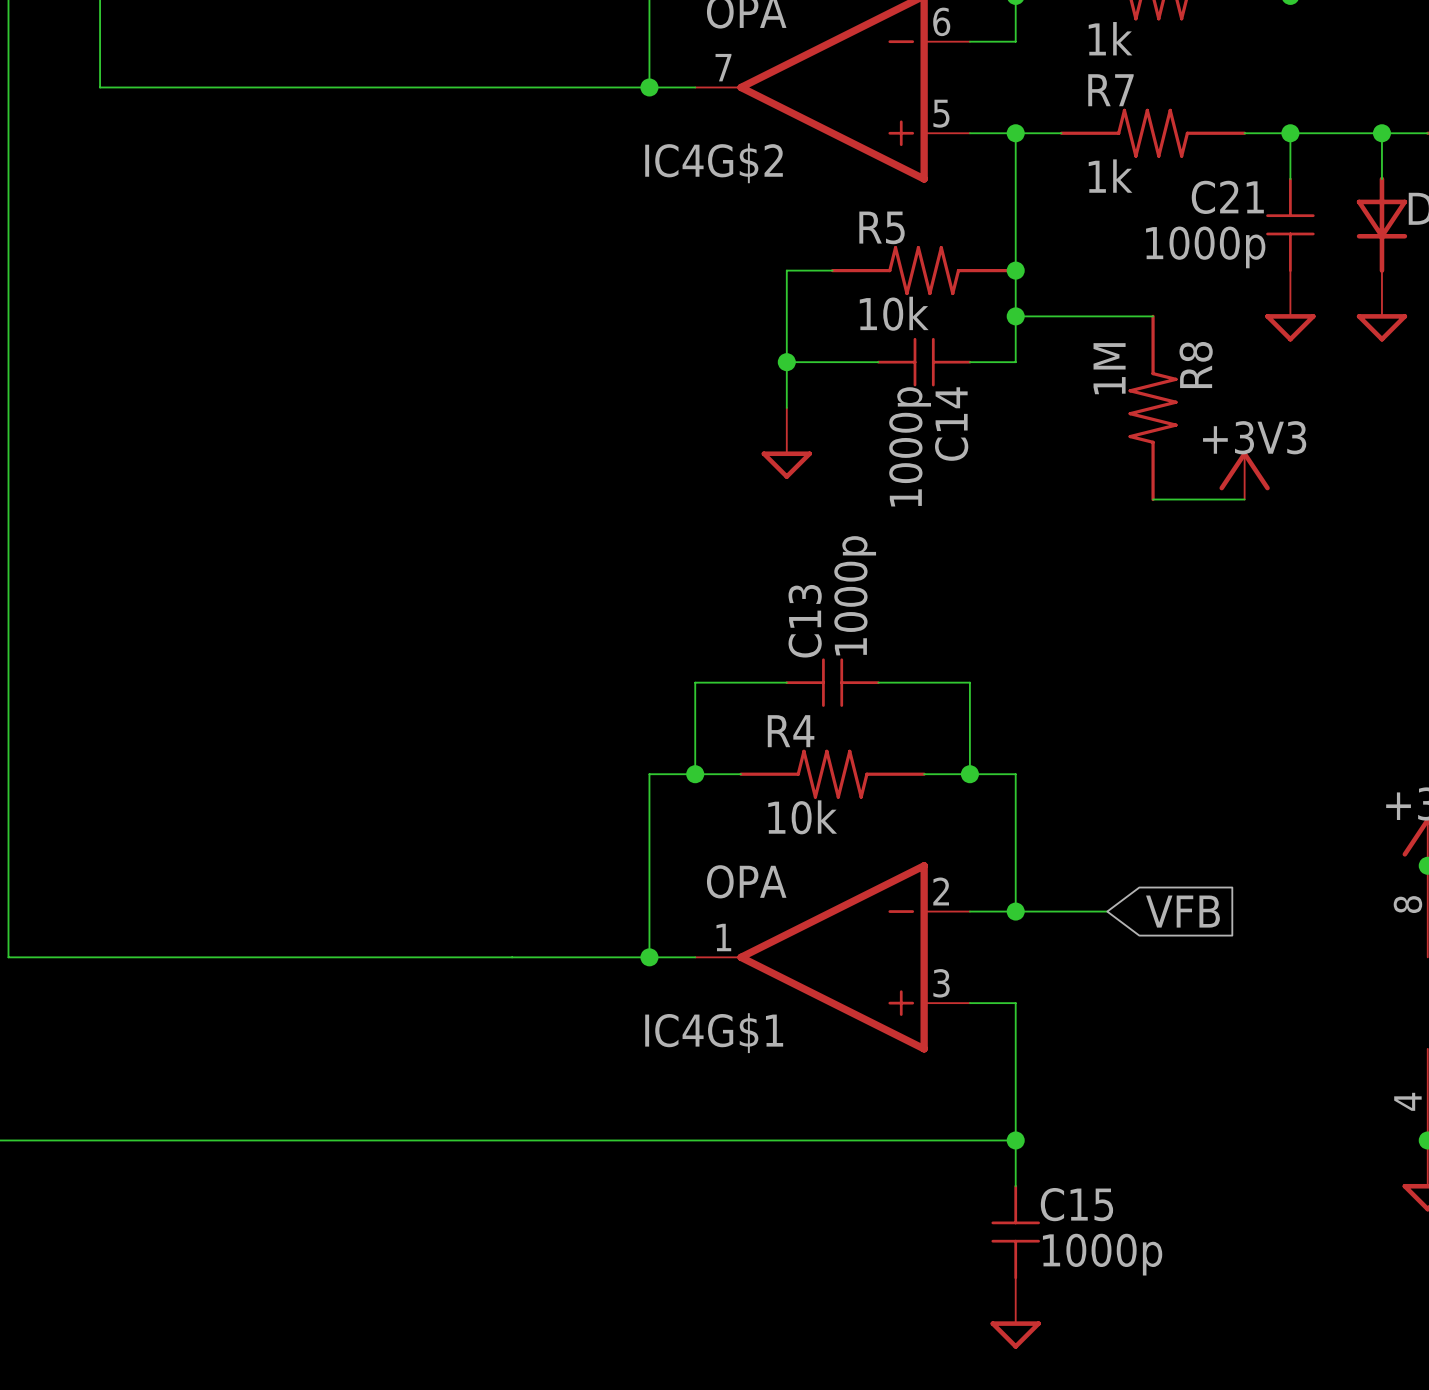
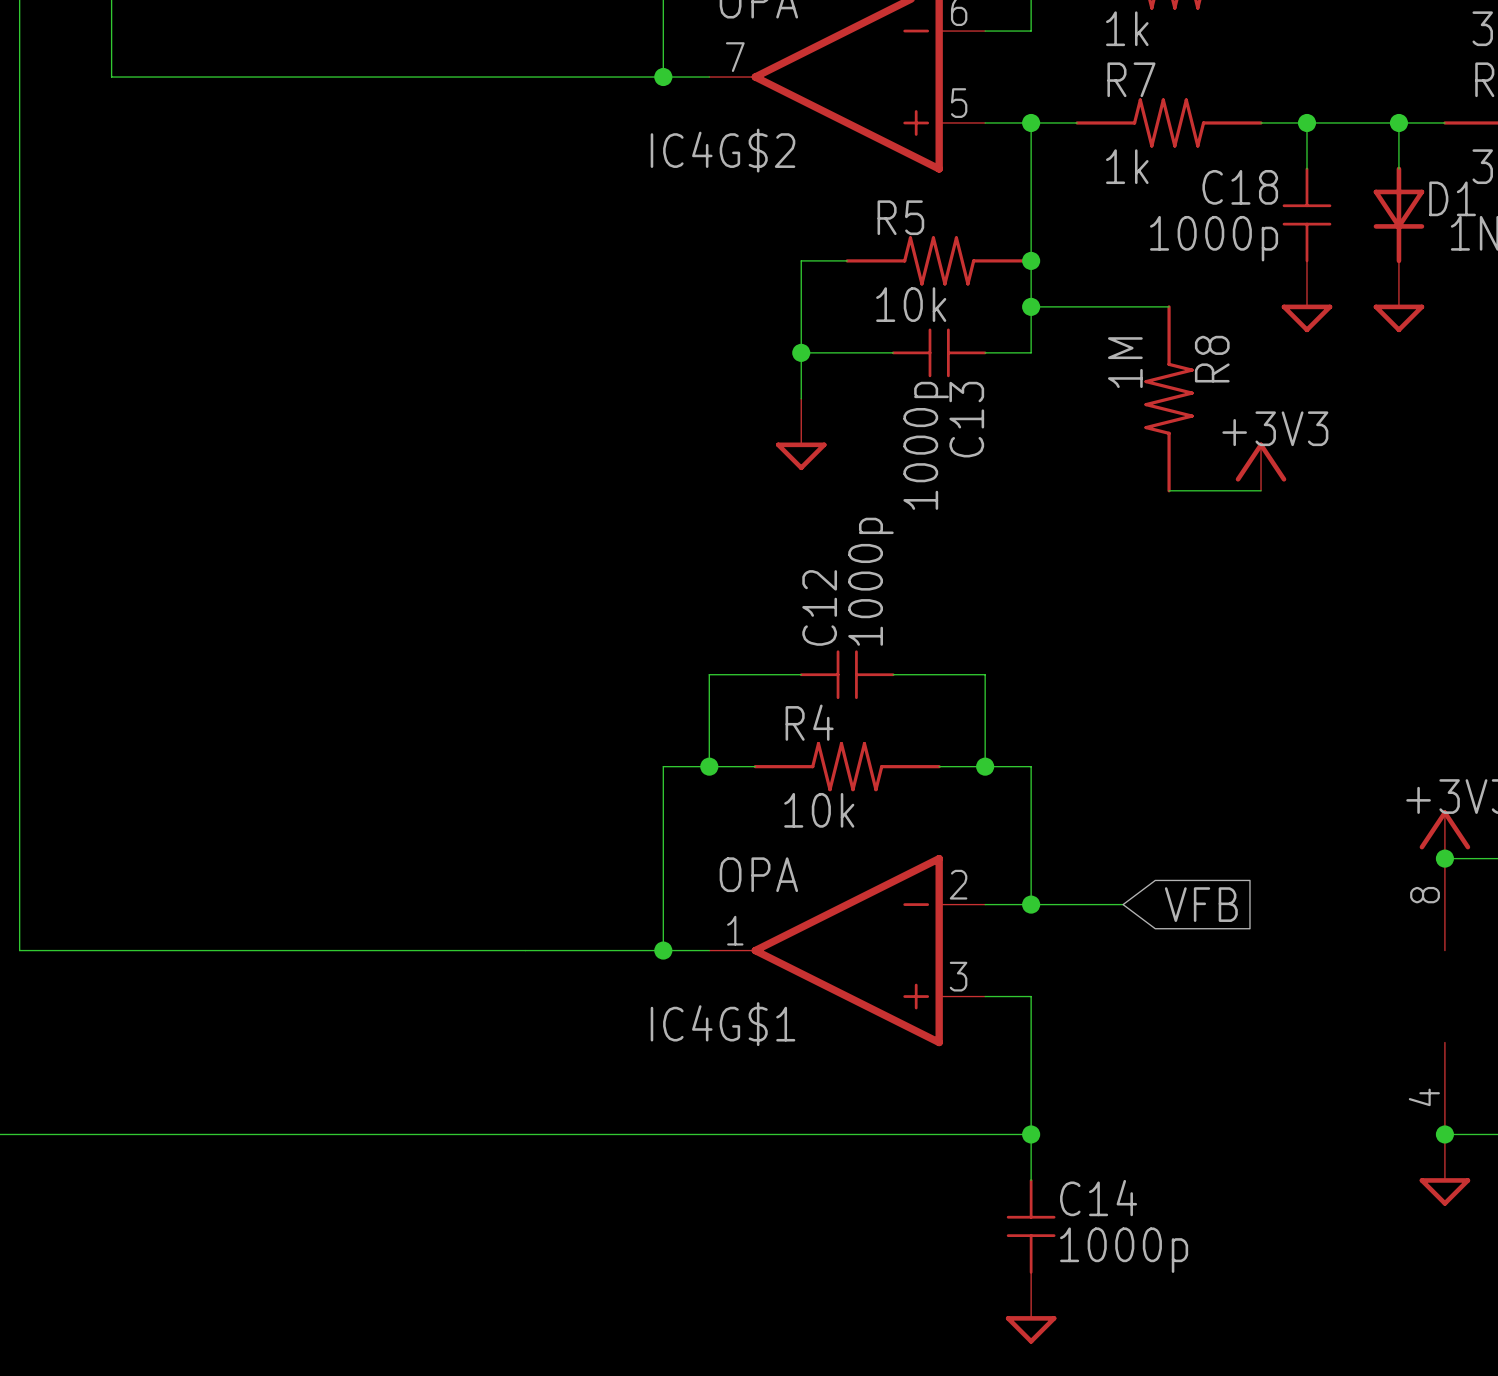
C21 name: C21 (1227, 197) -> C18 (1240, 187)
C14 name: C14 (951, 424) -> C13 (966, 419)
C13 name: C13 (805, 621) -> C12 (819, 607)
C15 name: C15 (1076, 1204) -> C14 (1098, 1198)

